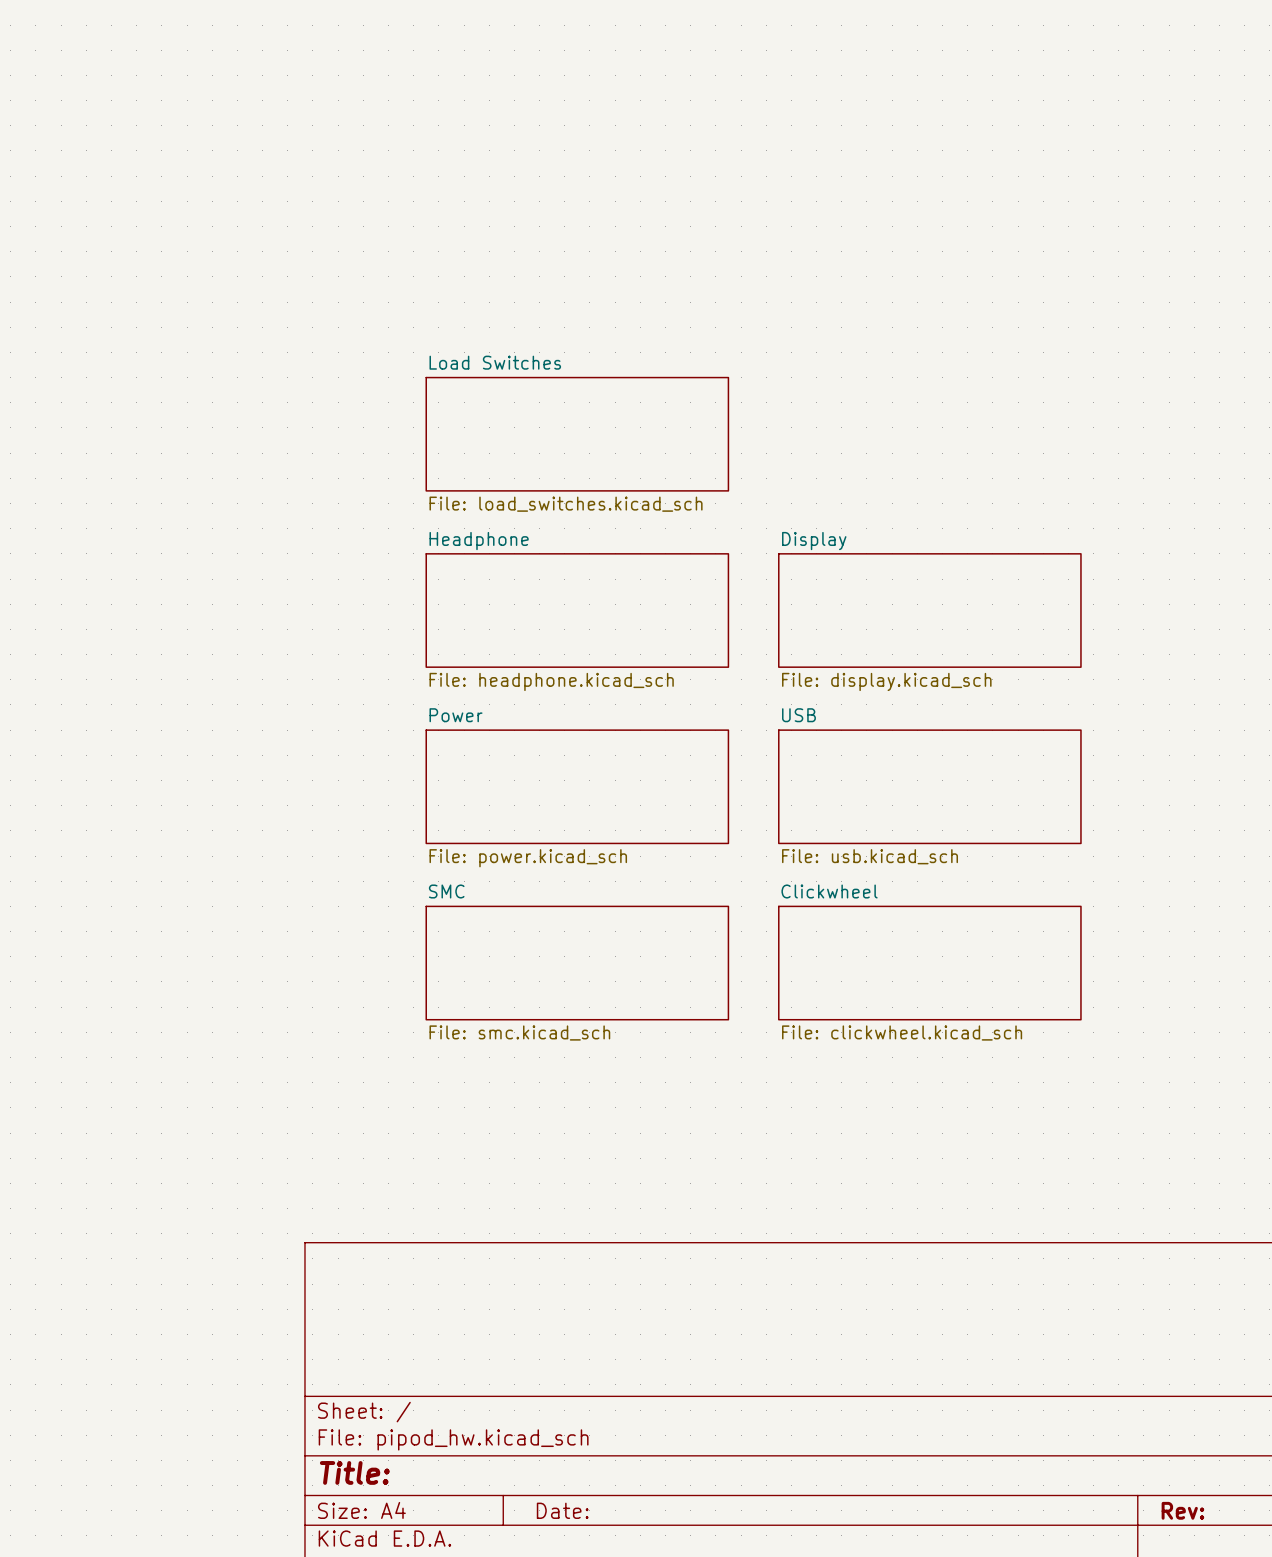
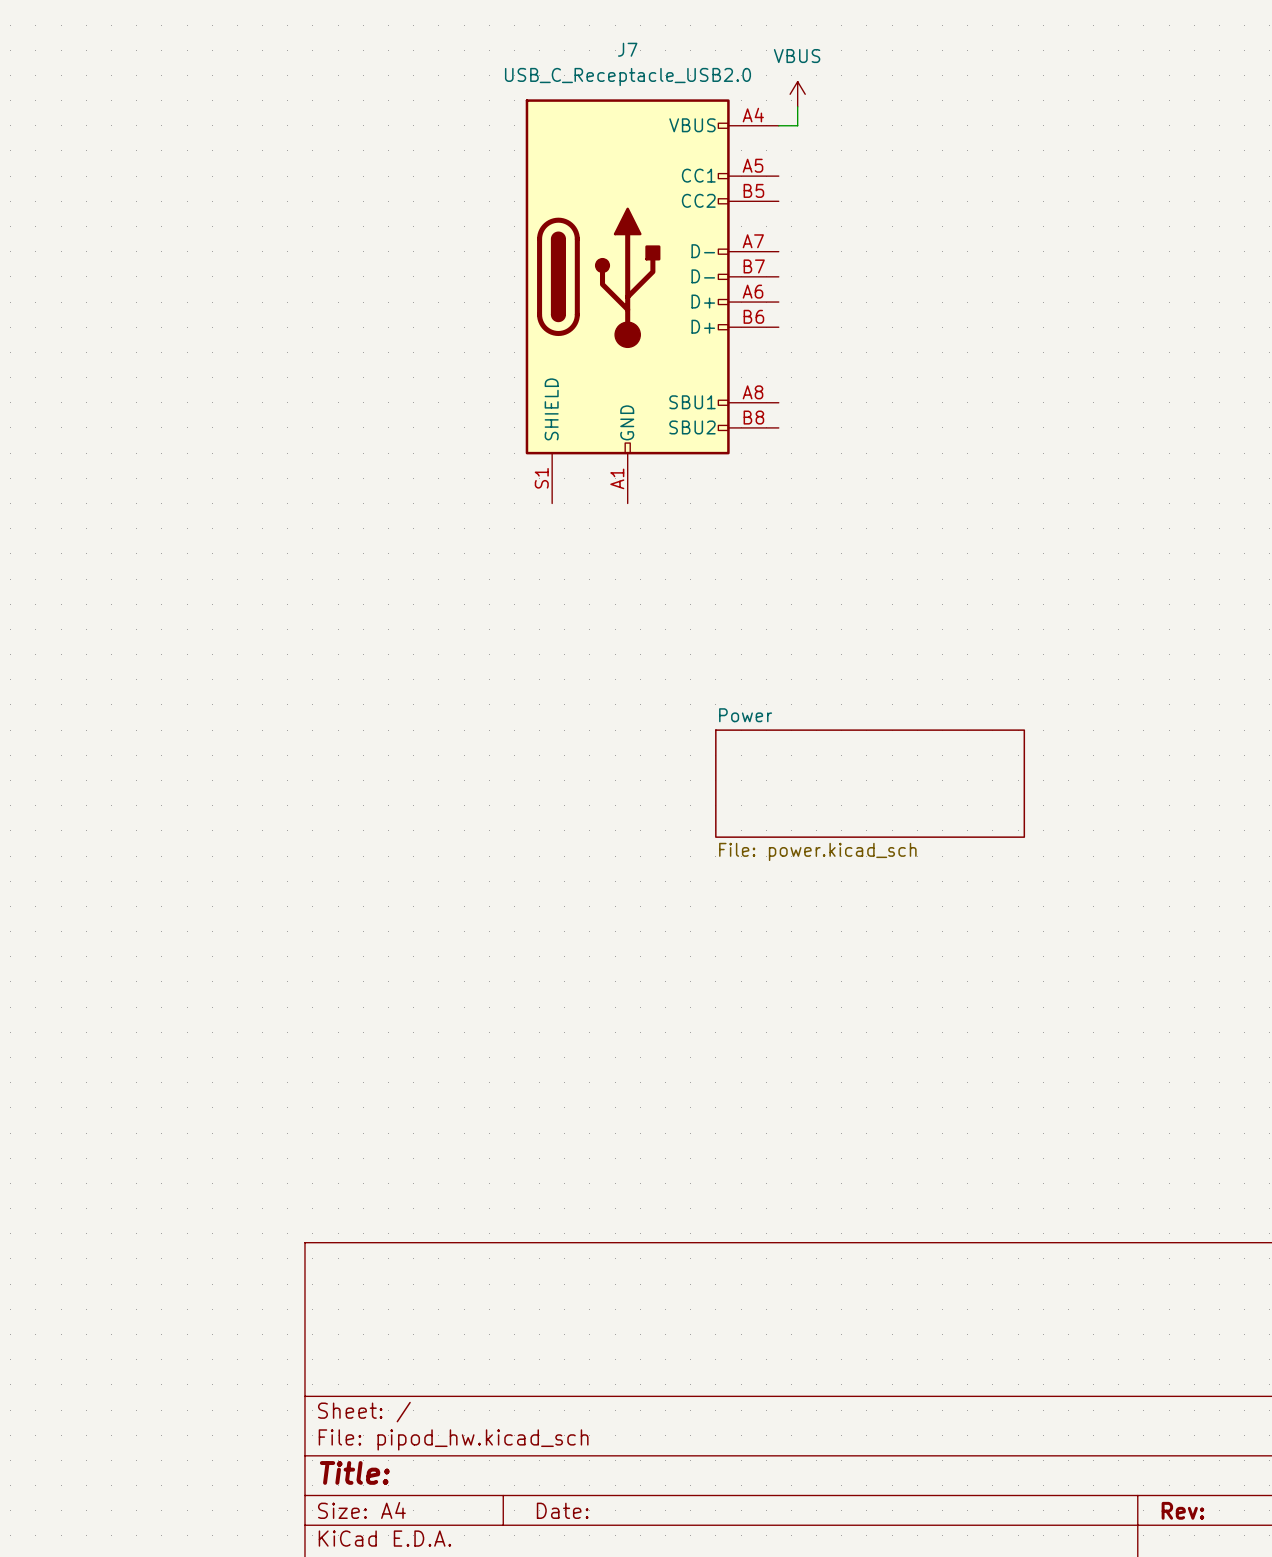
power symbol: none -> VBUS (797, 94)
wire: none -> (797, 106) (797, 125) (778, 125)
J7: none -> USB_C_Receptacle_USB2.0 (652, 301)
sheet Load Switches: File: load_switches.kicad_sch (577, 434) -> none
sheet Headphone: File: headphone.kicad_sch (577, 610) -> none
sheet Display: File: display.kicad_sch (929, 610) -> none
sheet Power: none -> File: power.kicad_sch (870, 783)
sheet Power: File: power.kicad_sch (577, 786) -> none
sheet USB: File: usb.kicad_sch (929, 786) -> none
sheet SMC: File: smc.kicad_sch (577, 963) -> none
sheet Clickwheel: File: clickwheel.kicad_sch (929, 963) -> none

